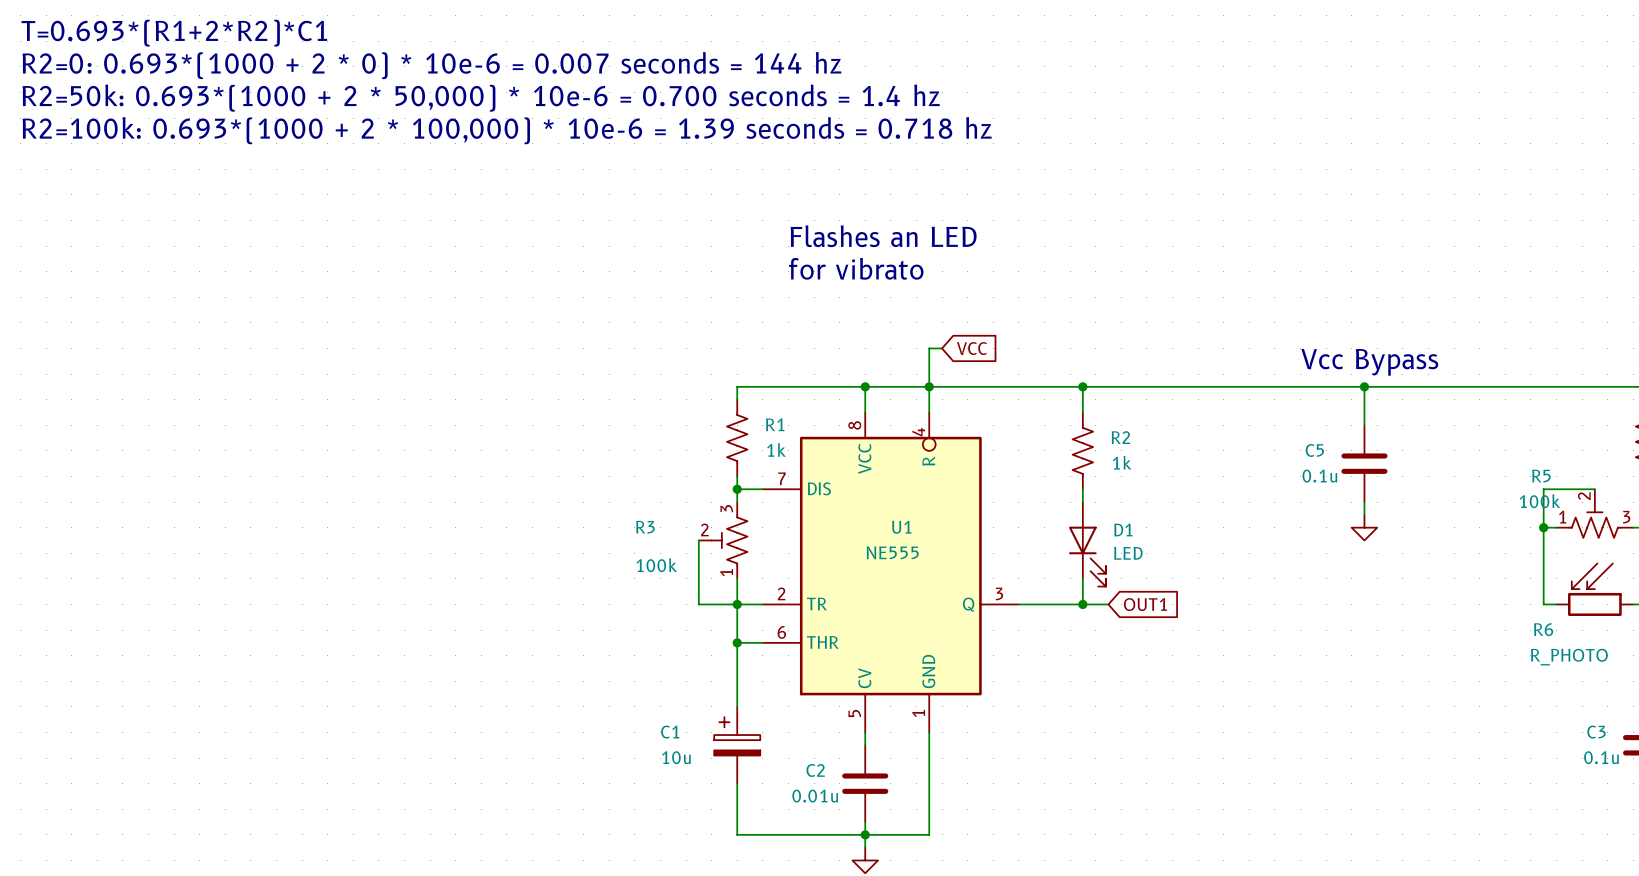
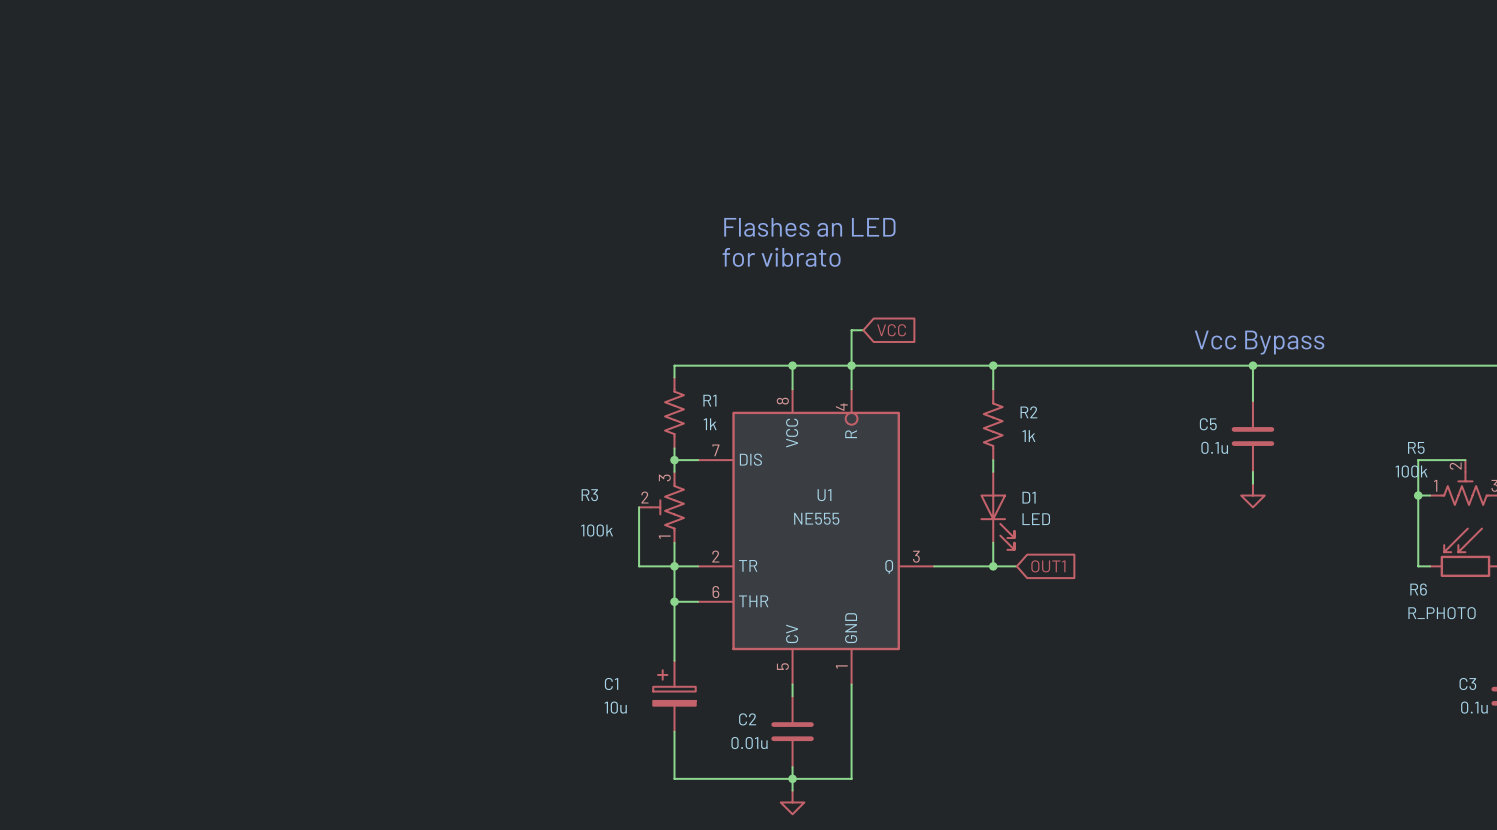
text: T=0.693*(R1+2*R2)*C1 (174, 33) -> none
text: R2=0: 0.693*(1000 + 2 * 0) * 10e-6 = 0.007 seconds = 144 hz (431, 65) -> none
text: R2=50k: 0.693*(1000 + 2 * 50,000) * 10e-6 = 0.700 seconds = 1.4 hz (481, 98) -> none
text: R2=100k: 0.693*(1000 + 2 * 100,000) * 10e-6 = 1.39 seconds = 0.718 hz (507, 130) -> none

